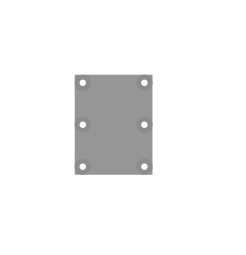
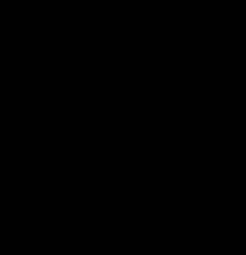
part: (113, 124) -> none

